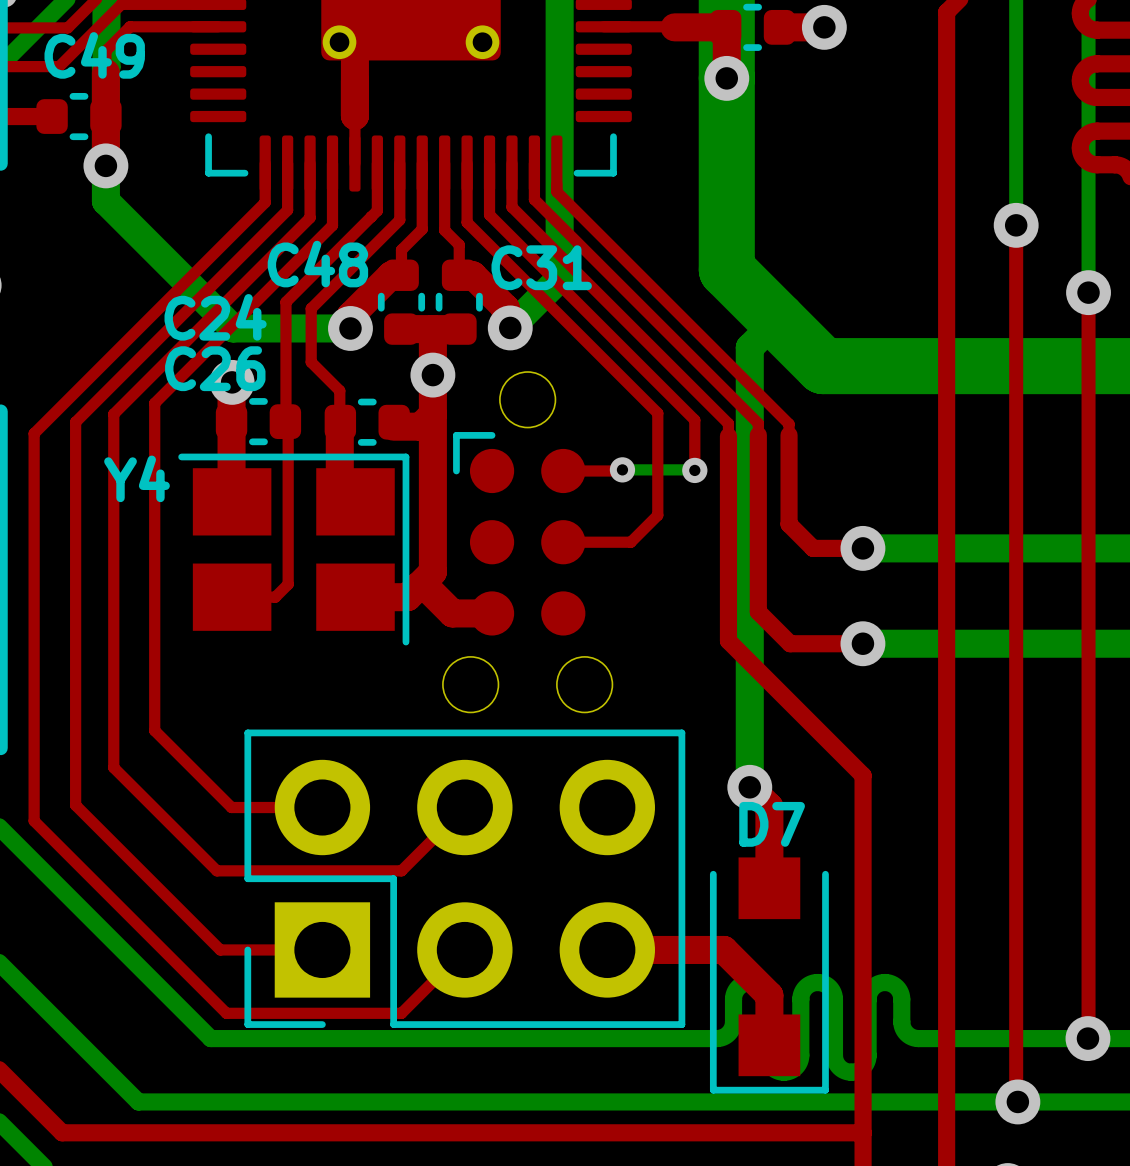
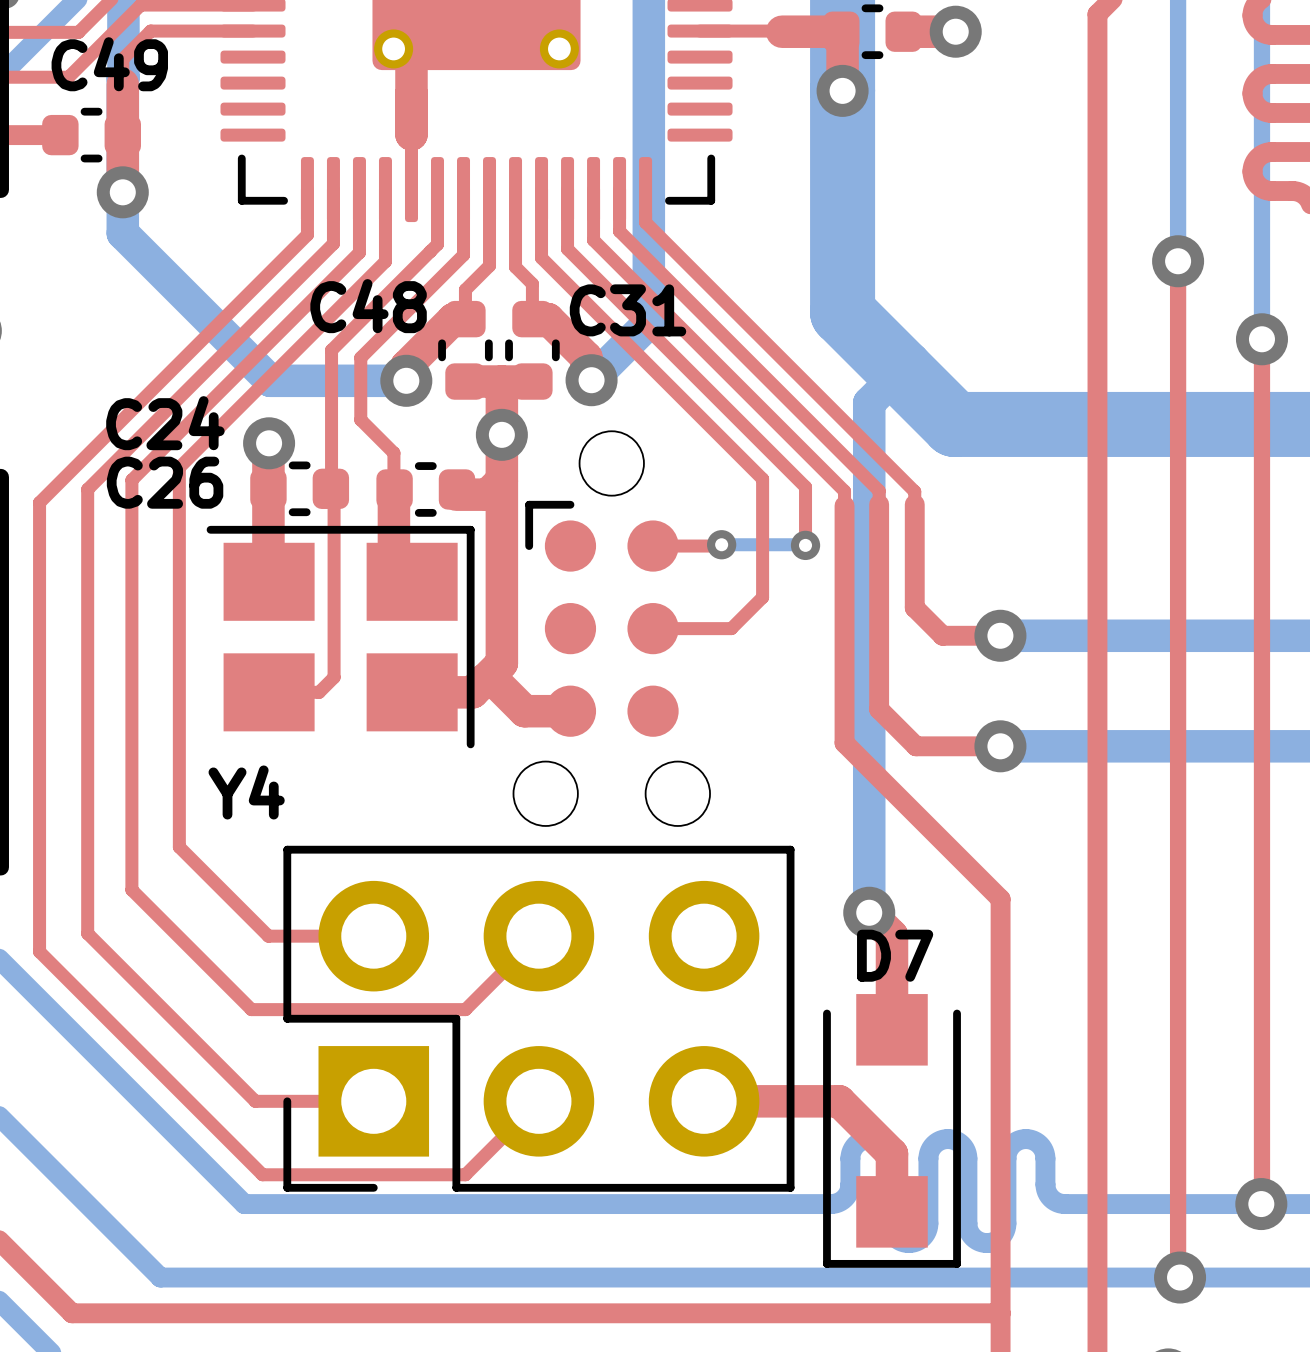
C24 name position: C24 (215, 317) -> C24 (165, 423)
C26 name position: C26 (215, 368) -> C26 (165, 482)
Y4 name position: Y4 (137, 478) -> Y4 (246, 792)

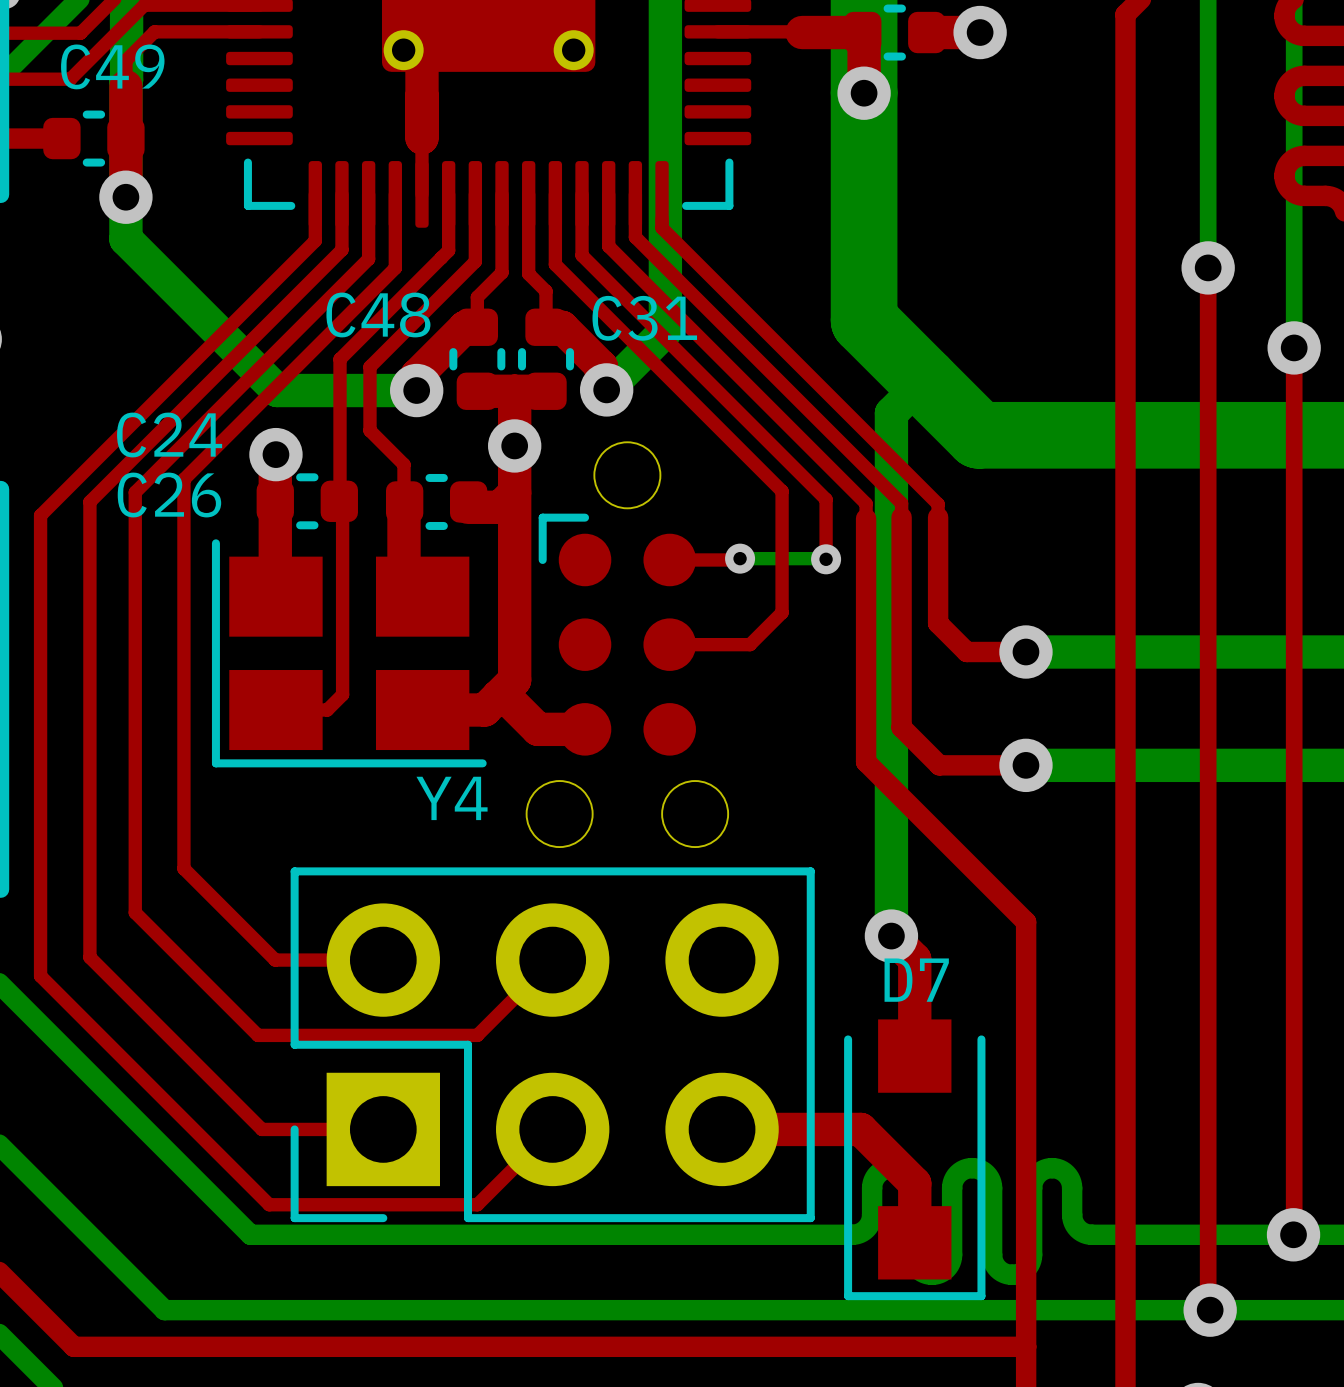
Y4 rotation: 0° (340, 637) -> 180° (349, 653)
Y4 name position: Y4 (246, 792) -> Y4 (452, 798)

